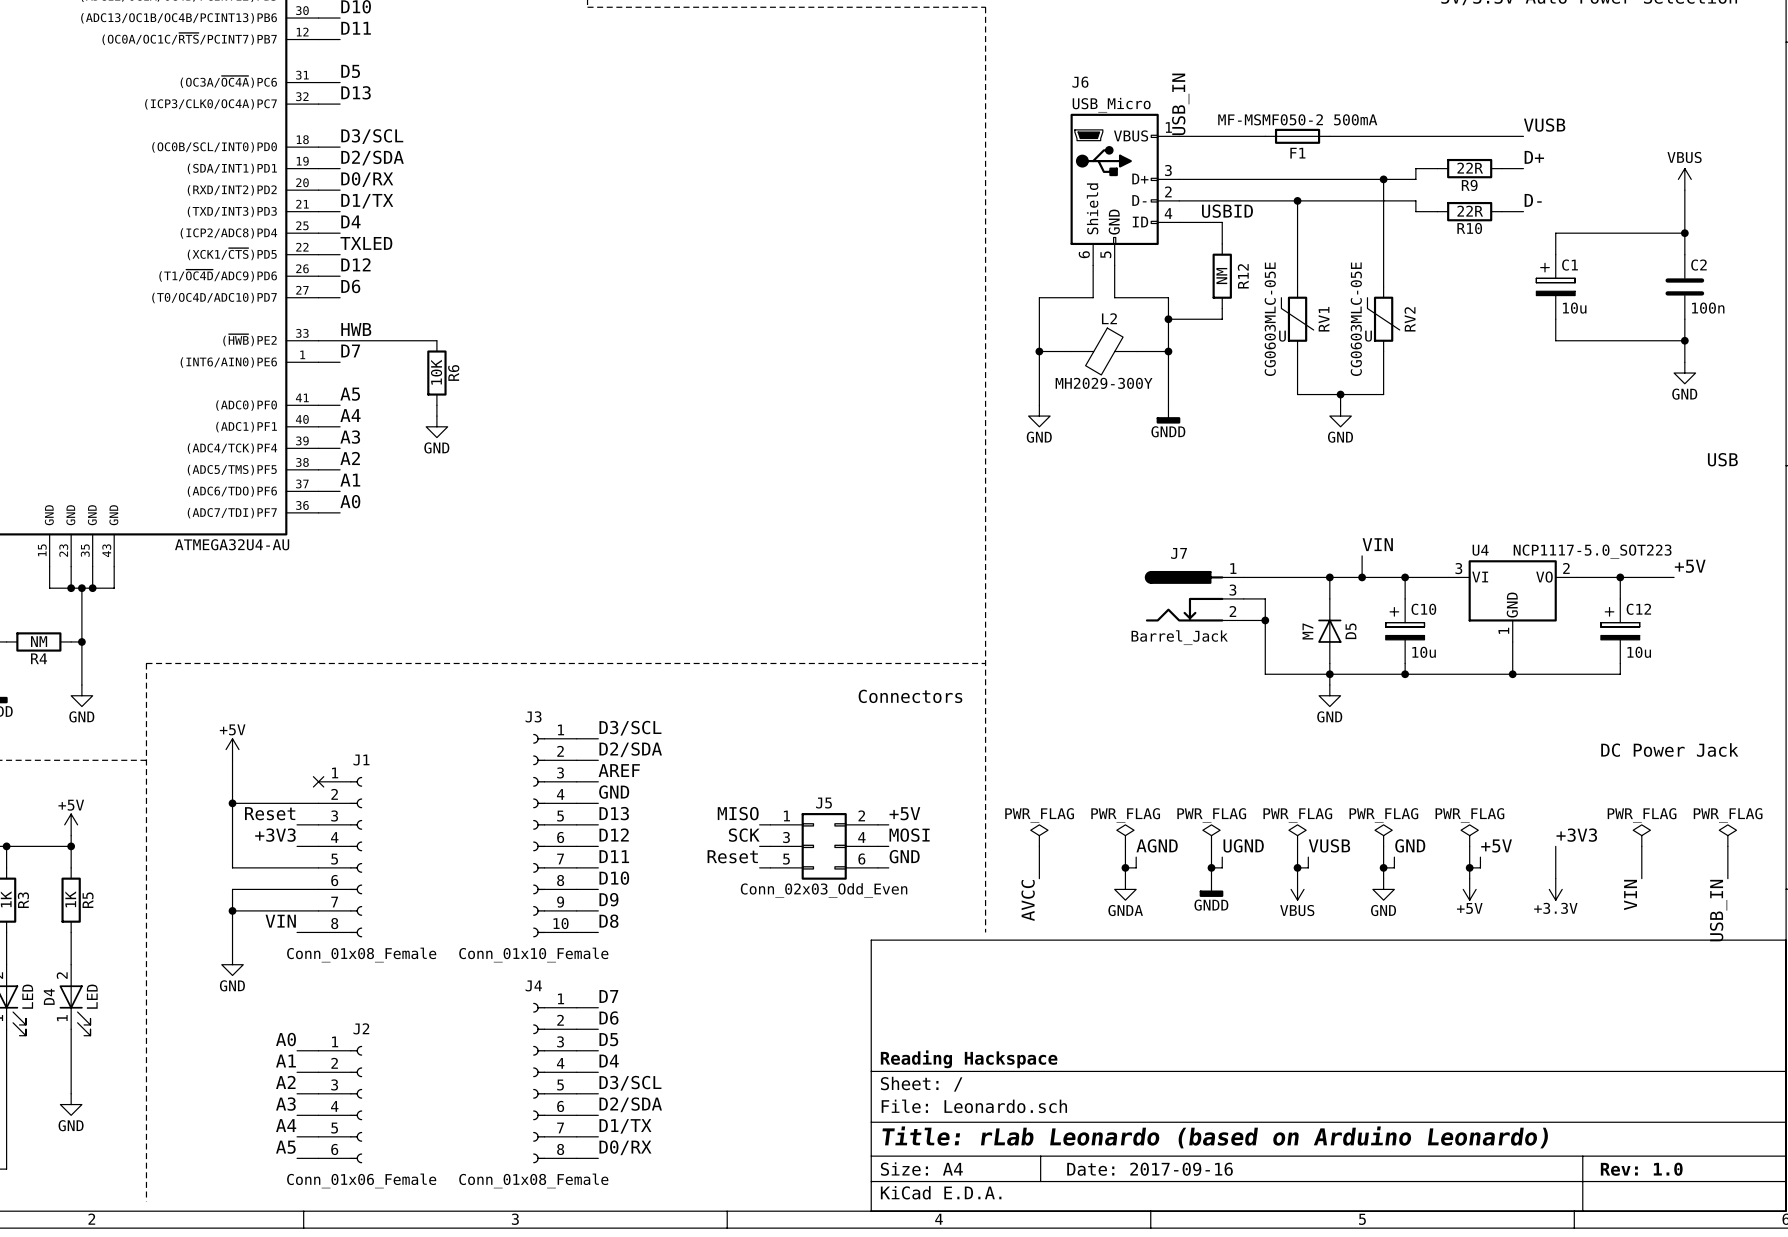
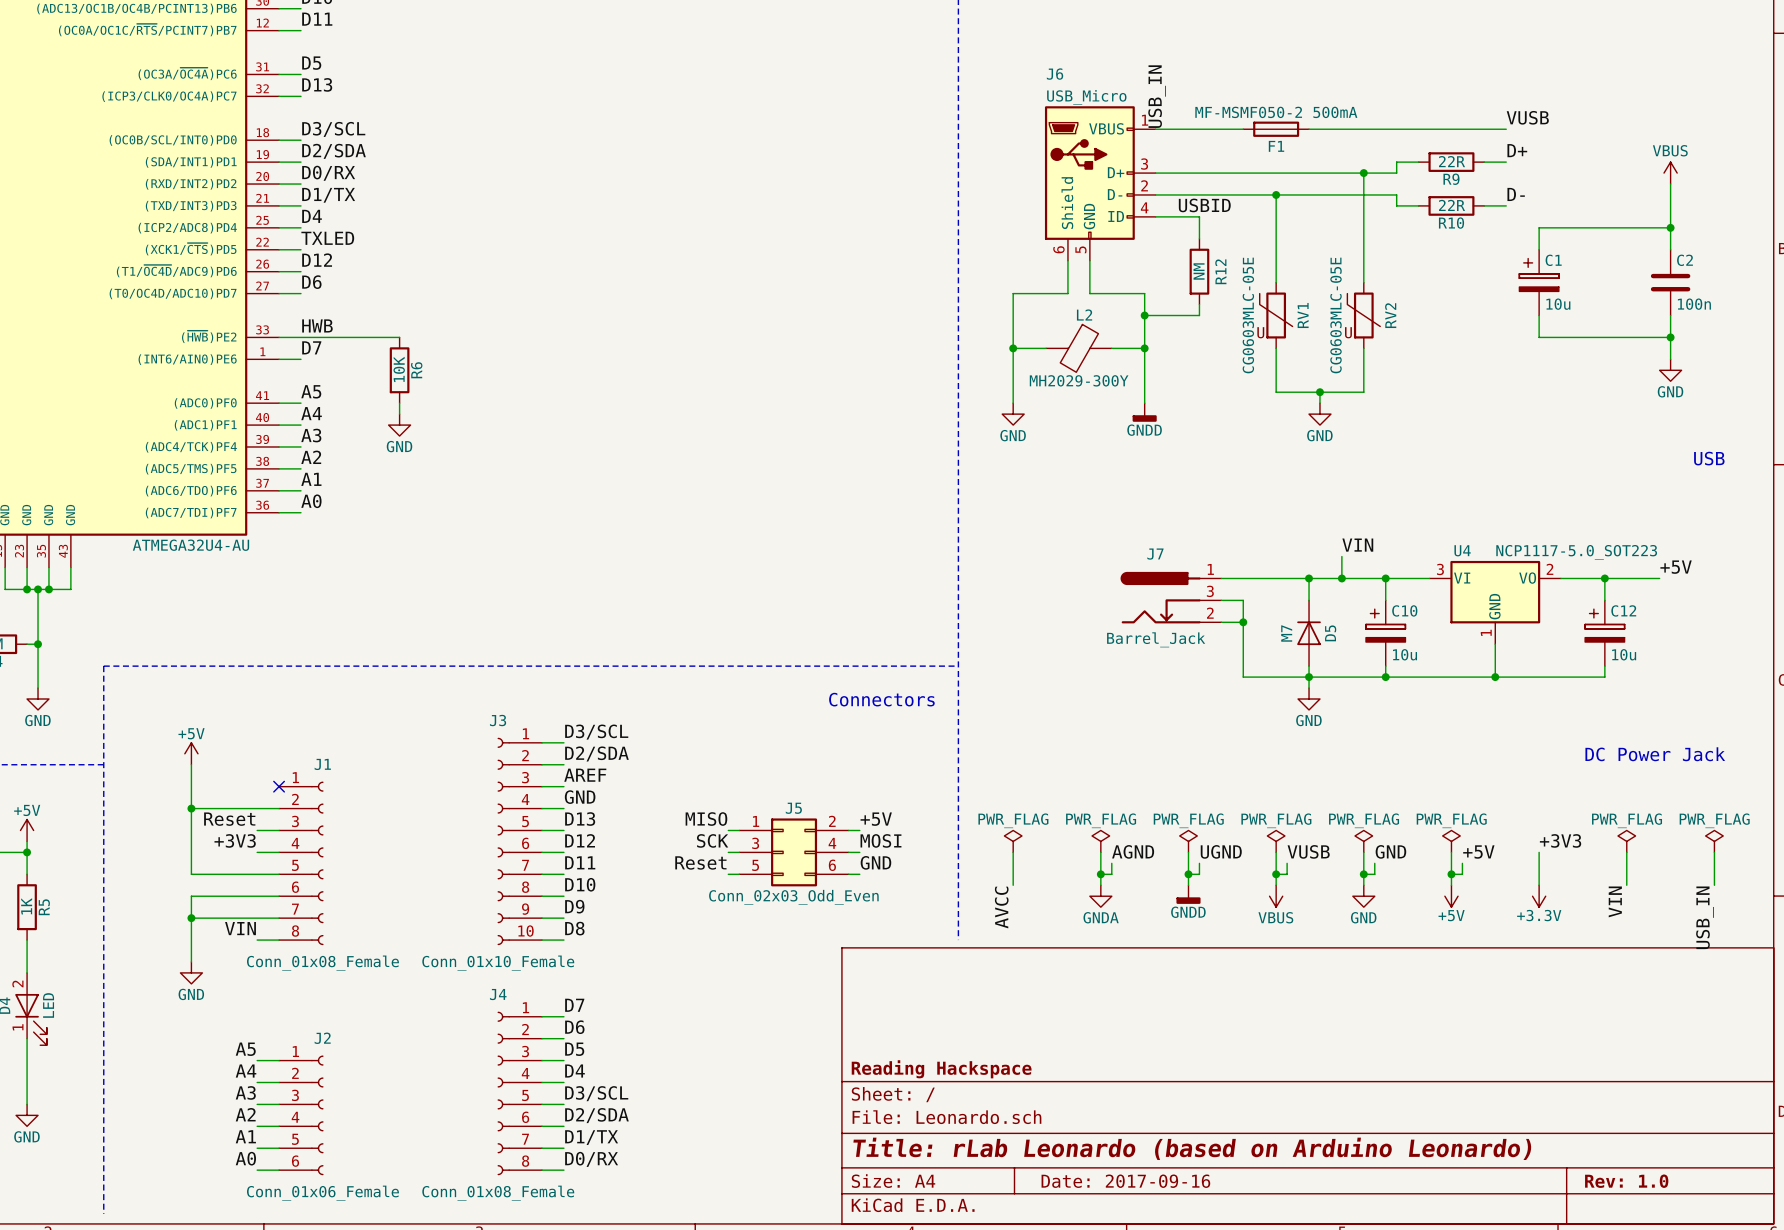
label: A0 (285, 1039) -> A5 (245, 1049)
label: A1 (285, 1061) -> A4 (246, 1071)
label: A2 (285, 1082) -> A3 (245, 1092)
label: A3 (285, 1104) -> A2 (245, 1114)
label: A4 (286, 1125) -> A1 (245, 1136)
label: A5 (285, 1147) -> A0 (245, 1158)

